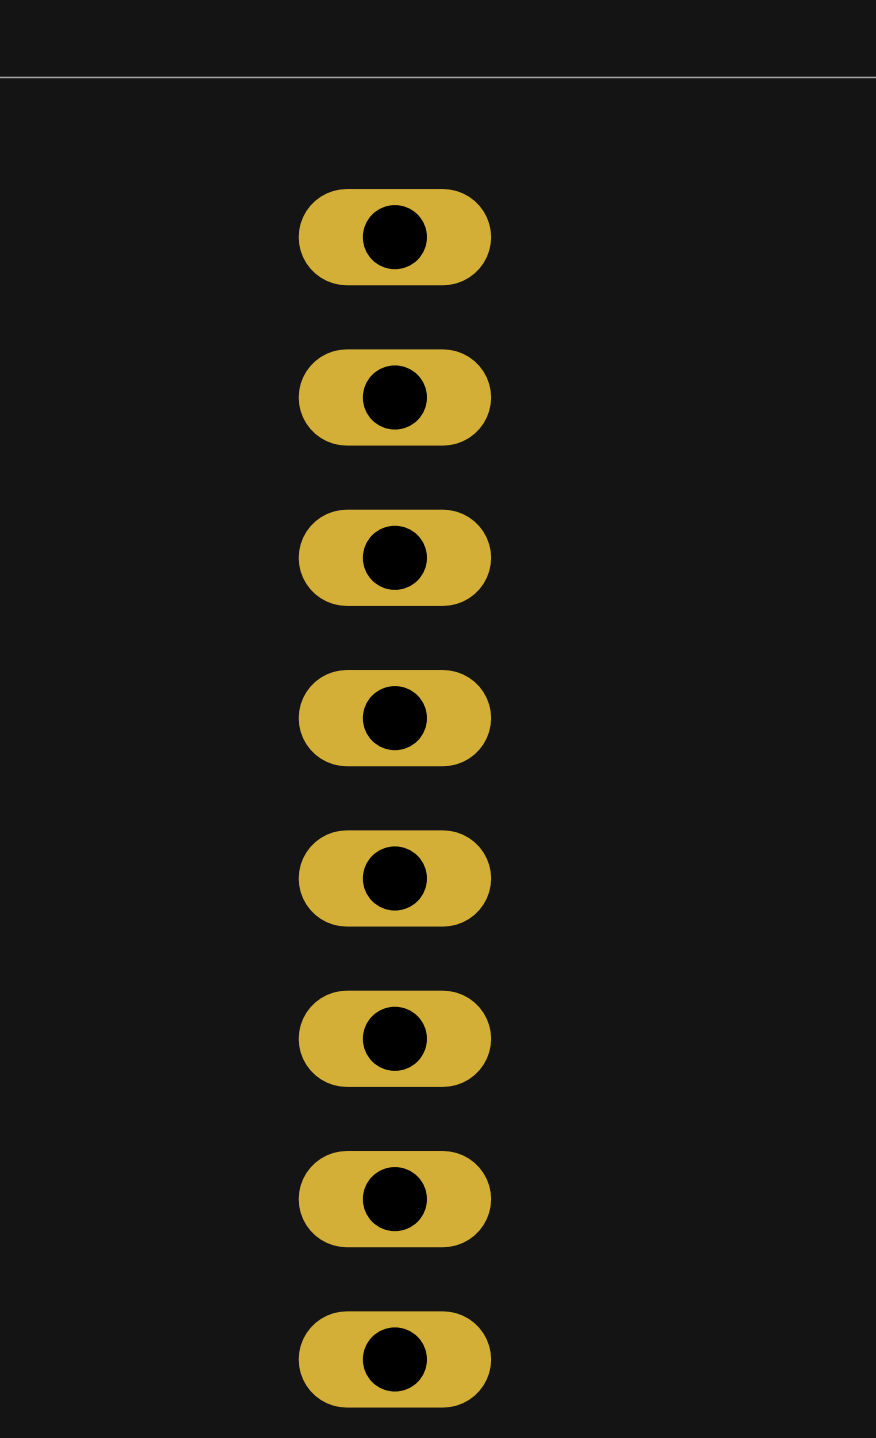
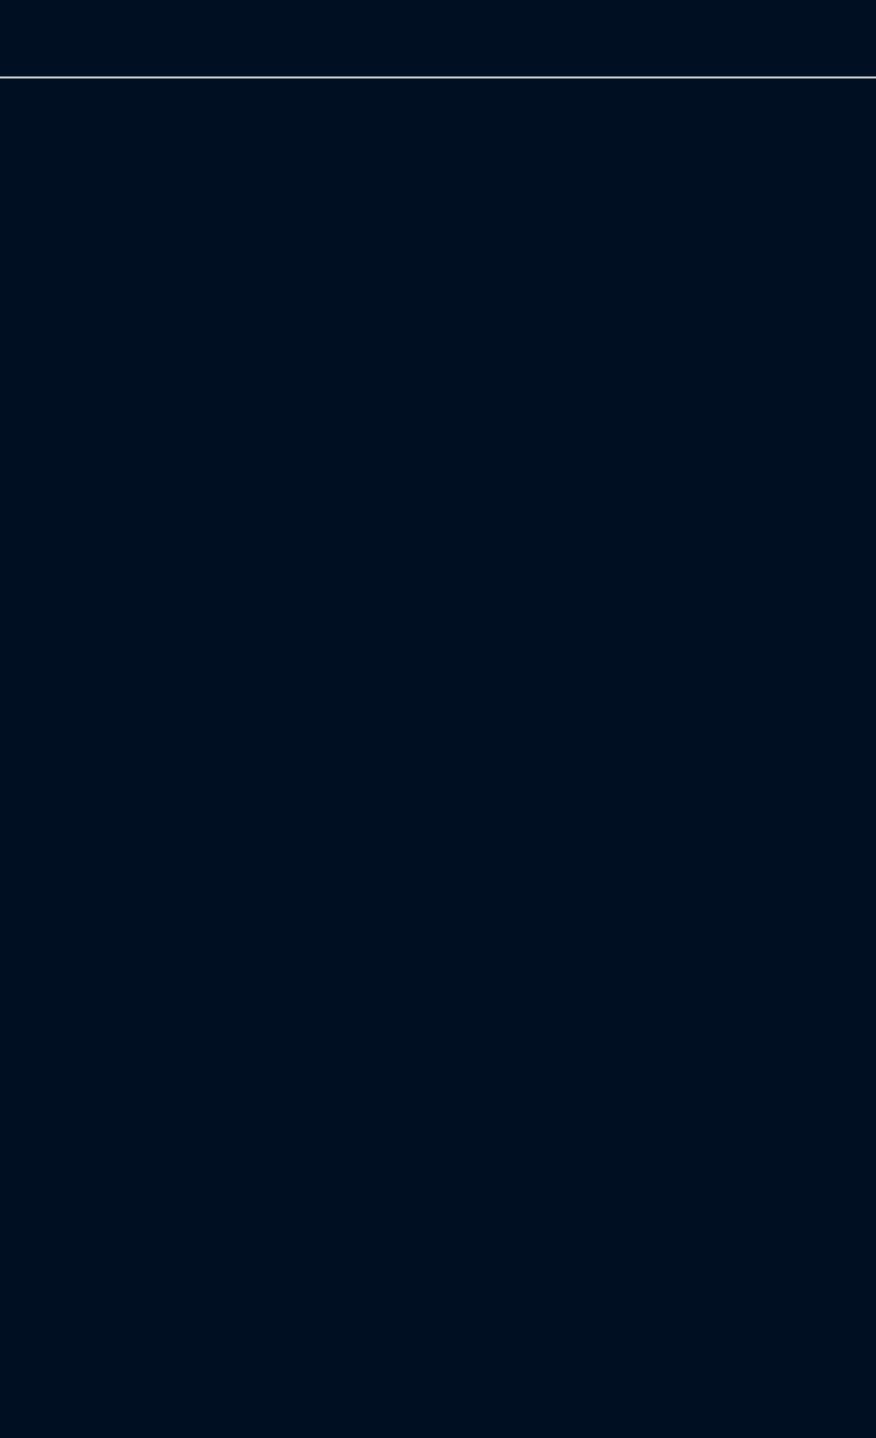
part: (394, 798) -> none

